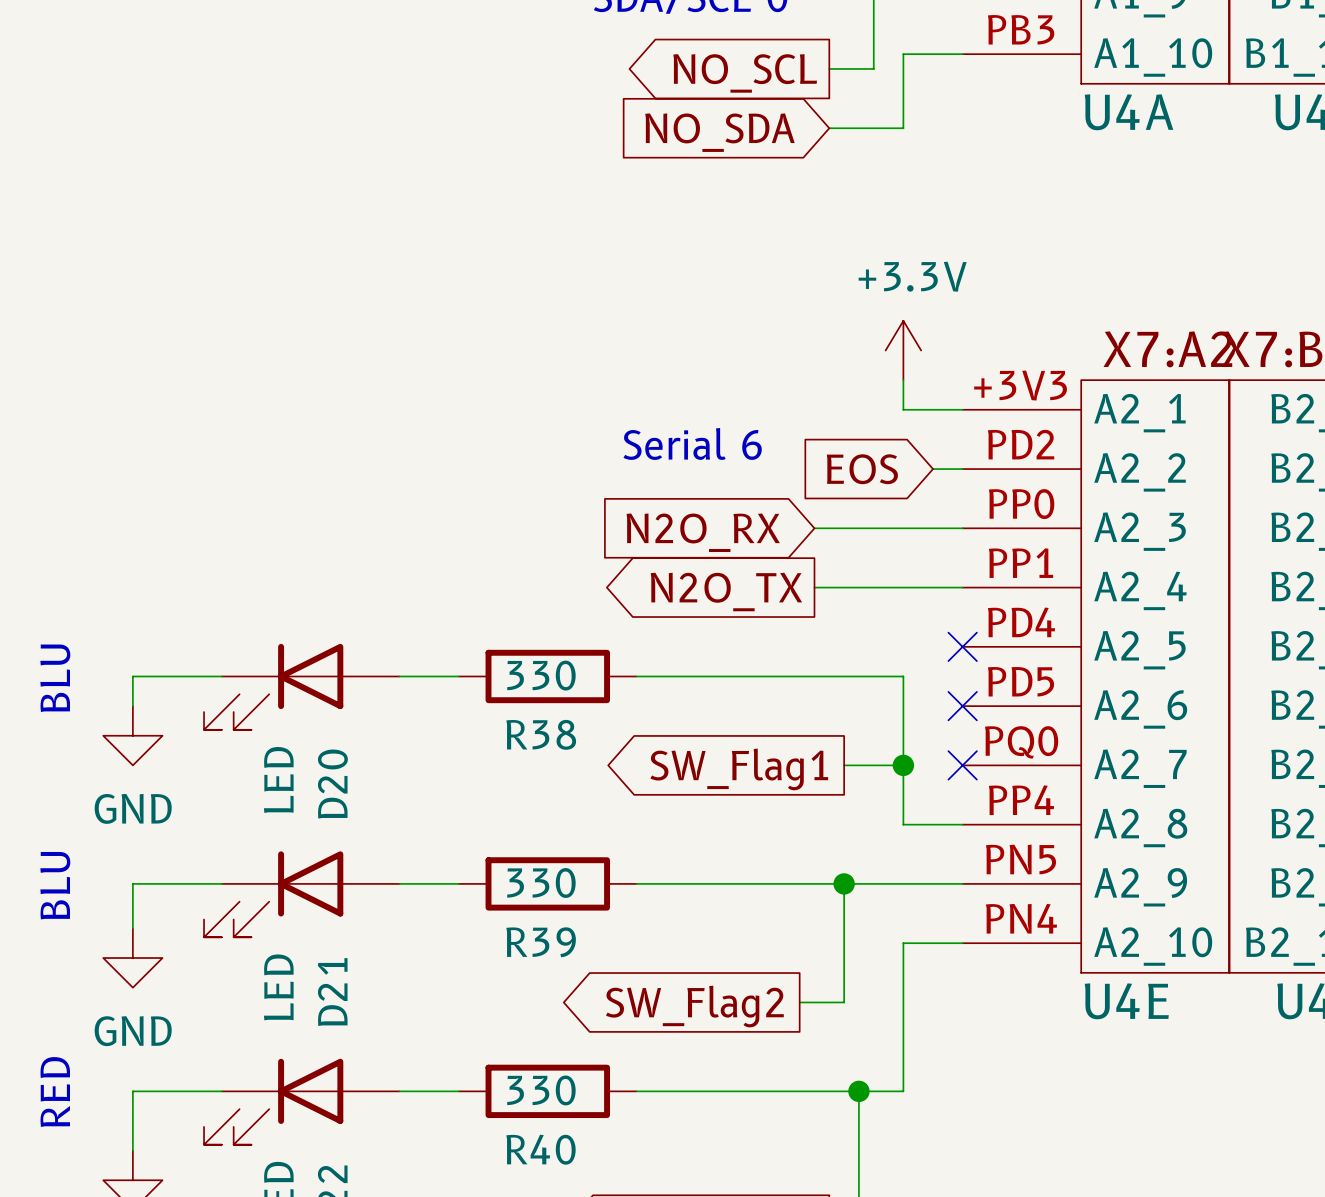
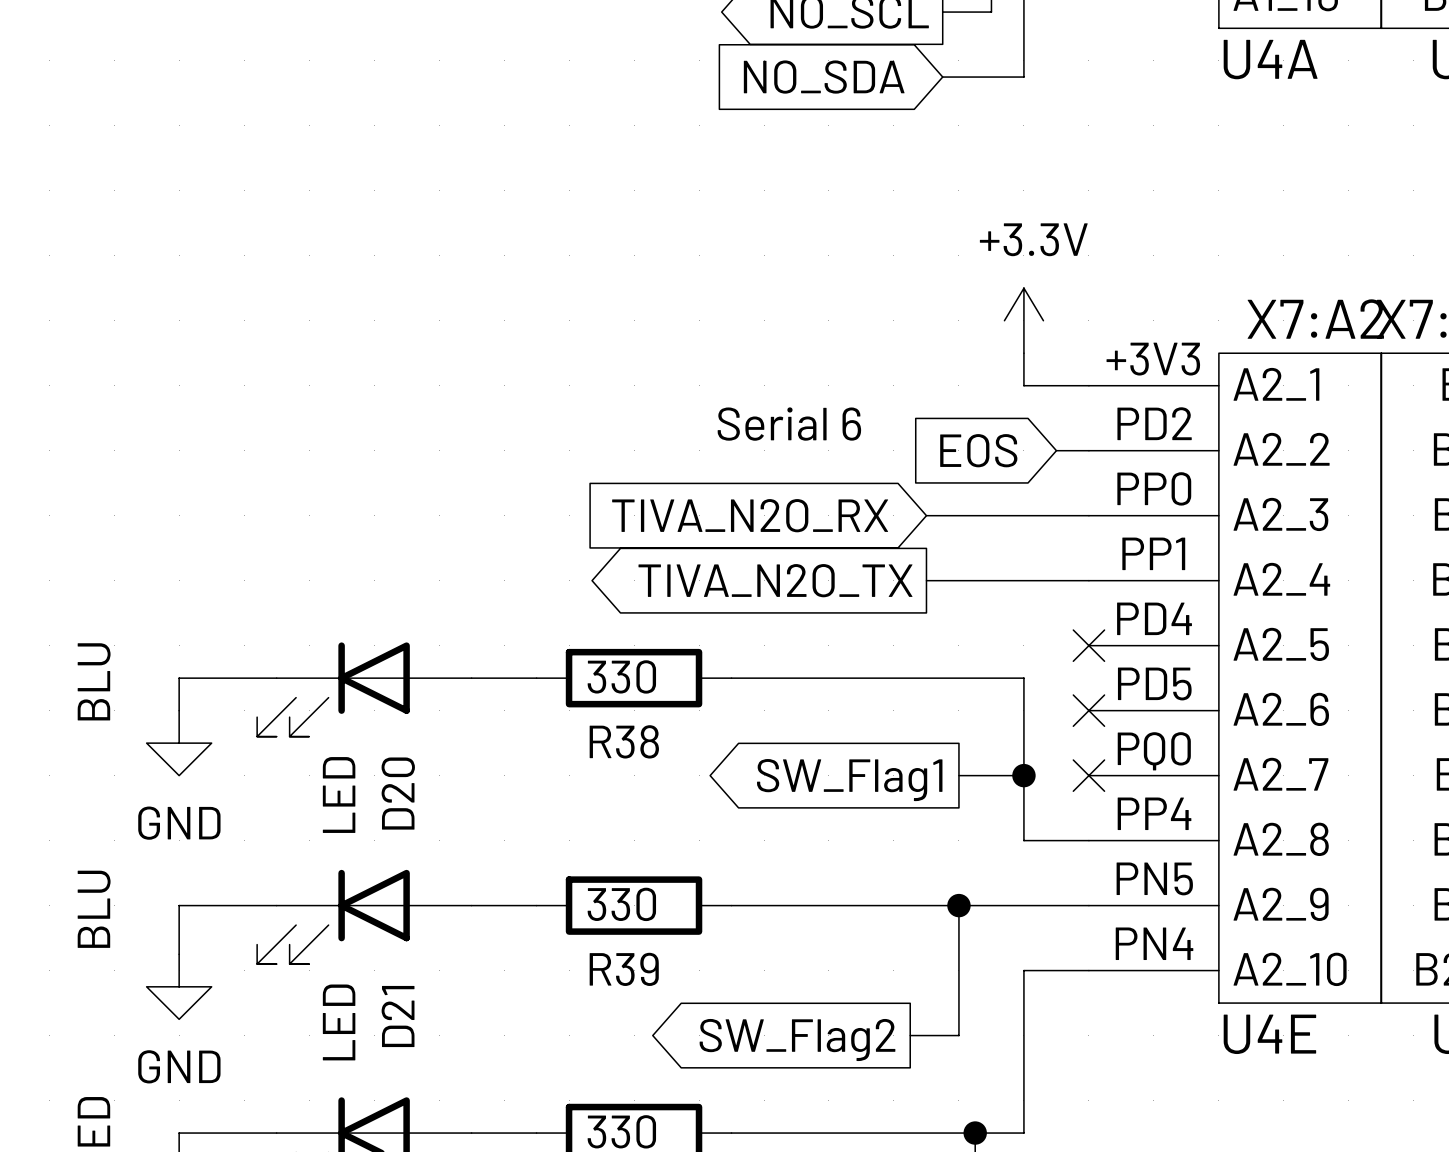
global label: N2O_RX (703, 532) -> TIVA_N2O_RX (750, 515)
global label: N2O_TX (726, 592) -> TIVA_N2O_TX (775, 580)

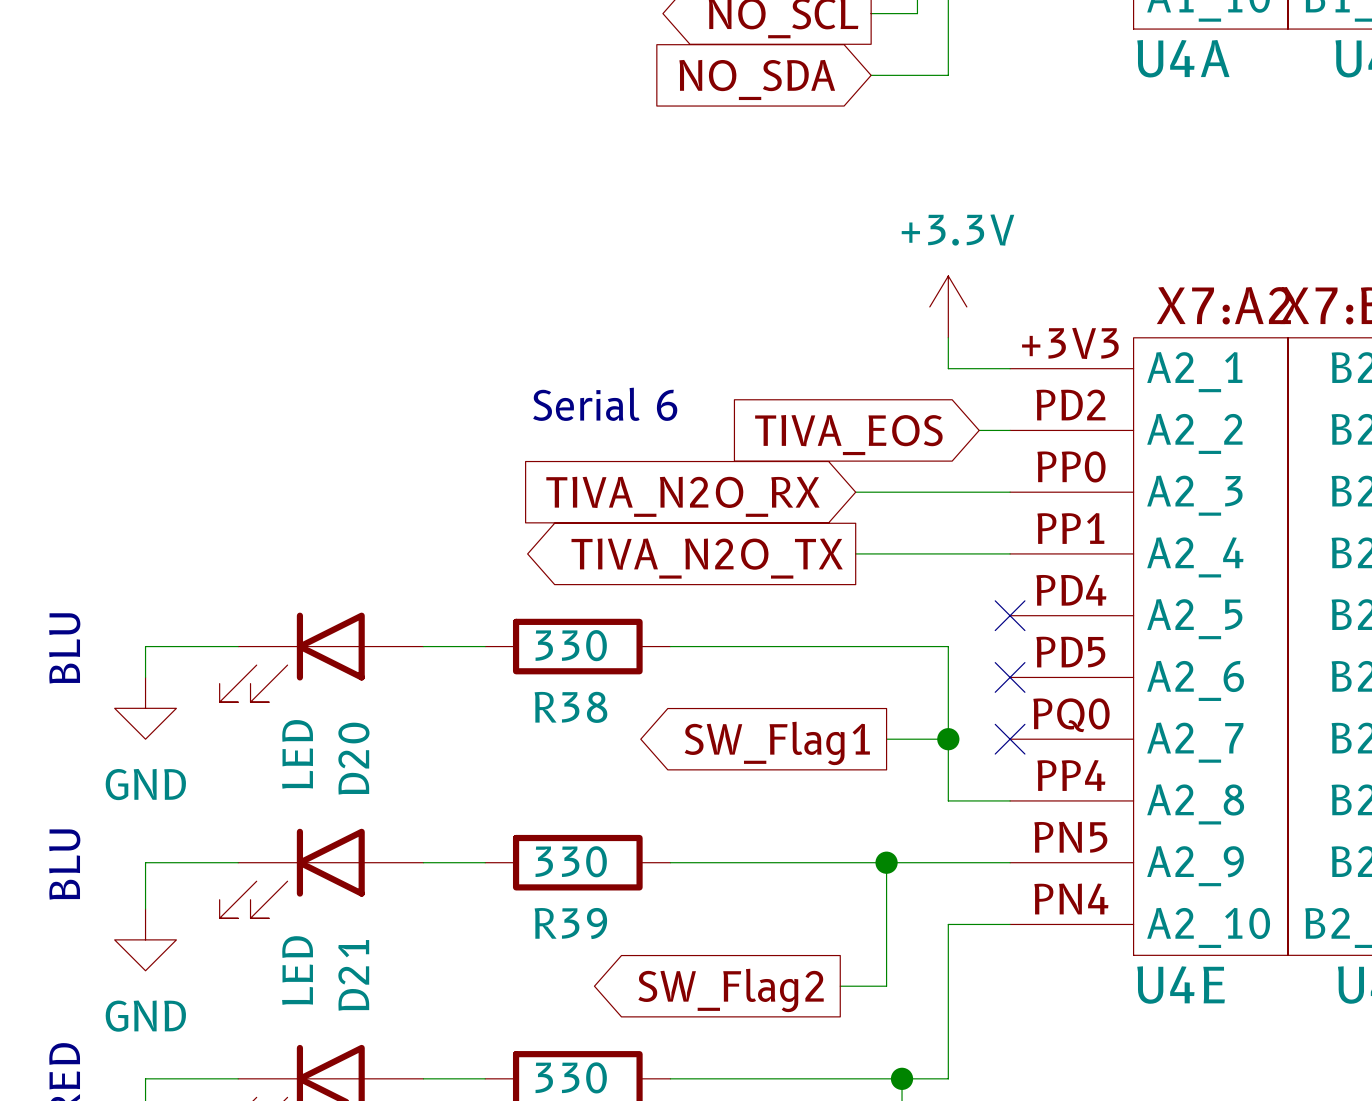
text position: Serial 6 (789, 424) -> Serial 6 (605, 404)
global label: EOS (978, 450) -> TIVA_EOS (848, 435)

